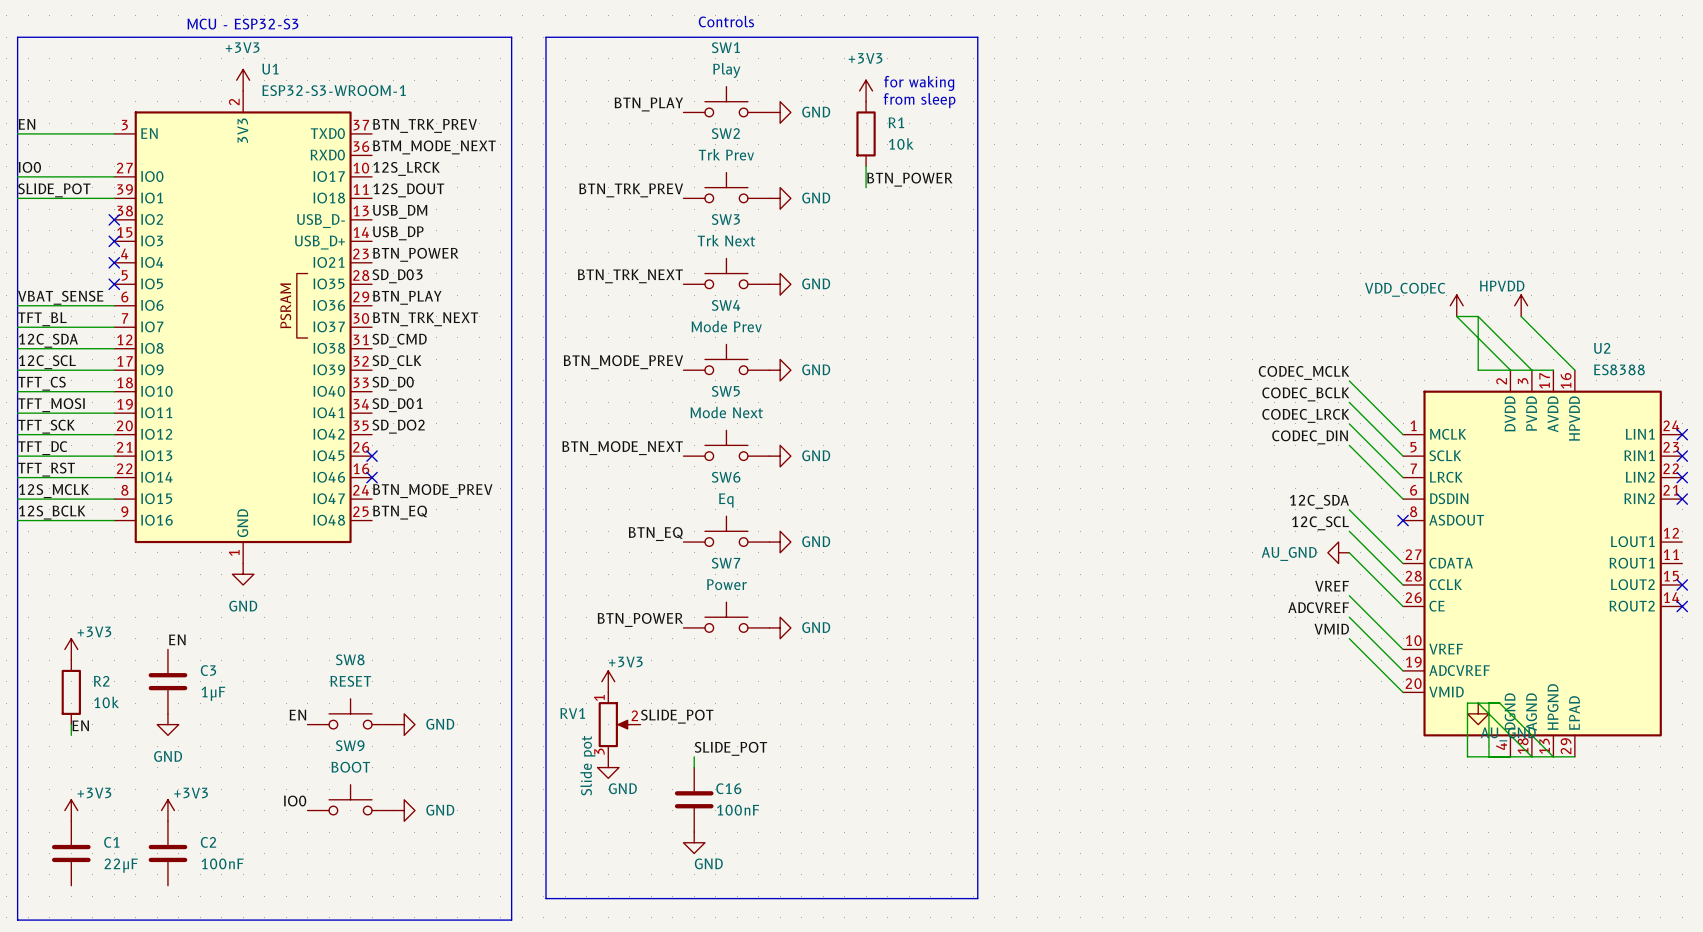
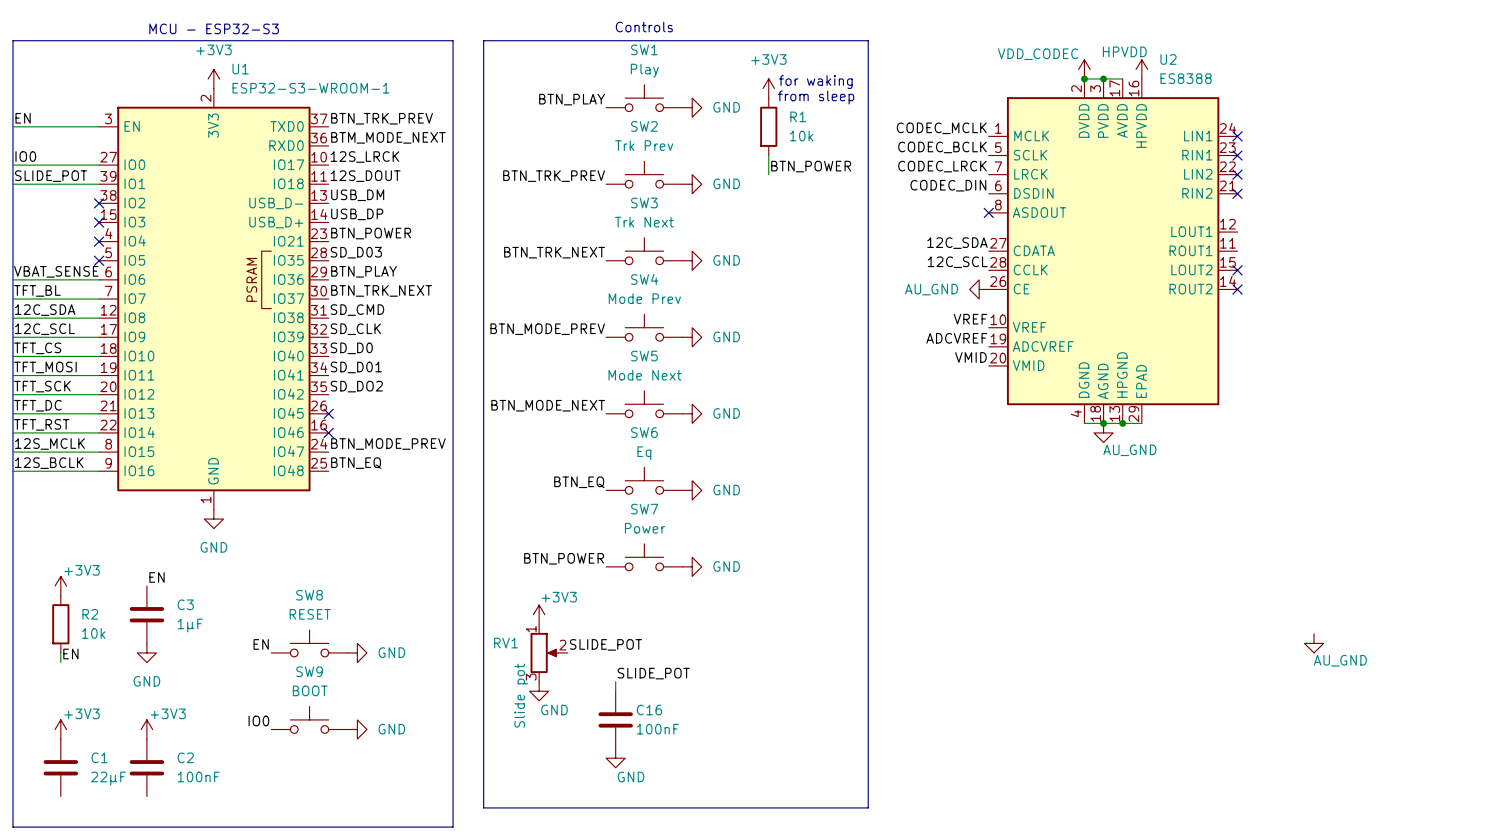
power symbol: none -> VDD_CODEC (1084, 69)
power symbol: none -> HPVDD (1141, 69)
wire: none -> (1084, 78) (1122, 78)
junction: none -> (1084, 78)
junction: none -> (1103, 78)
label: none -> CODEC_MCLK (941, 128)
no-connect mark: none -> (1237, 136)
label: none -> CODEC_BCLK (942, 147)
no-connect mark: none -> (1237, 155)
label: none -> CODEC_LRCK (942, 166)
no-connect mark: none -> (1237, 174)
label: none -> CODEC_DIN (948, 185)
no-connect mark: none -> (1237, 193)
no-connect mark: none -> (988, 212)
label: none -> 12C_SDA (957, 243)
label: none -> 12C_SCL (957, 262)
no-connect mark: none -> (1237, 270)
power symbol: VDD_CODEC (1456, 305) -> none
power symbol: HPVDD (1521, 305) -> none
power symbol: none -> AU_GND (979, 289)
no-connect mark: none -> (1237, 289)
wire: (1478, 316) (1478, 370) (1553, 370) -> none
wire: (1478, 316) (1456, 316) (1510, 370) -> none
wire: (1478, 316) (1531, 370) -> none
wire: (1521, 316) (1574, 370) -> none
label: none -> VREF (970, 319)
label: none -> ADCVREF (956, 338)
label: CODEC_MCLK (1304, 372) -> none
wire: (1349, 380) (1403, 434) -> none
label: none -> VMID (970, 357)
label: CODEC_BCLK (1305, 394) -> none
wire: (1349, 402) (1403, 456) -> none
label: CODEC_LRCK (1305, 415) -> none
wire: (1349, 423) (1403, 477) -> none
no-connect mark: (1682, 434) -> none
label: CODEC_DIN (1310, 437) -> none
wire: (1349, 445) (1403, 499) -> none
no-connect mark: (1682, 456) -> none
wire: none -> (1084, 423) (1141, 423)
junction: none -> (1103, 423)
junction: none -> (1122, 423)
no-connect mark: (1682, 477) -> none
no-connect mark: (1682, 499) -> none
label: 12C_SDA (1319, 501) -> none
wire: (1349, 509) (1403, 563) -> none
no-connect mark: (1403, 520) -> none
label: 12C_SCL (1320, 523) -> none
wire: (1349, 531) (1403, 584) -> none
power symbol rotation: 0° (1338, 552) -> 90° counterclockwise (1103, 432)
power symbol position: AU_GND (1338, 552) -> AU_GND (1103, 432)
wire: (1349, 552) (1403, 606) -> none
power symbol text position: AU_GND (1289, 553) -> AU_GND (1129, 450)
U2 position: (1542, 563) -> (1113, 251)
no-connect mark: (1682, 584) -> none
label: VREF (1332, 586) -> none
wire: (1349, 595) (1403, 649) -> none
no-connect mark: (1682, 606) -> none
label: ADCVREF (1318, 607) -> none
wire: (1349, 617) (1403, 670) -> none
label: VMID (1331, 629) -> none
wire: (1349, 638) (1403, 692) -> none
wire: (1478, 703) (1531, 756) -> none
wire: (1488, 703) (1488, 756) -> none
wire: (1553, 756) (1499, 703) (1467, 703) (1467, 756) (1574, 756) -> none

